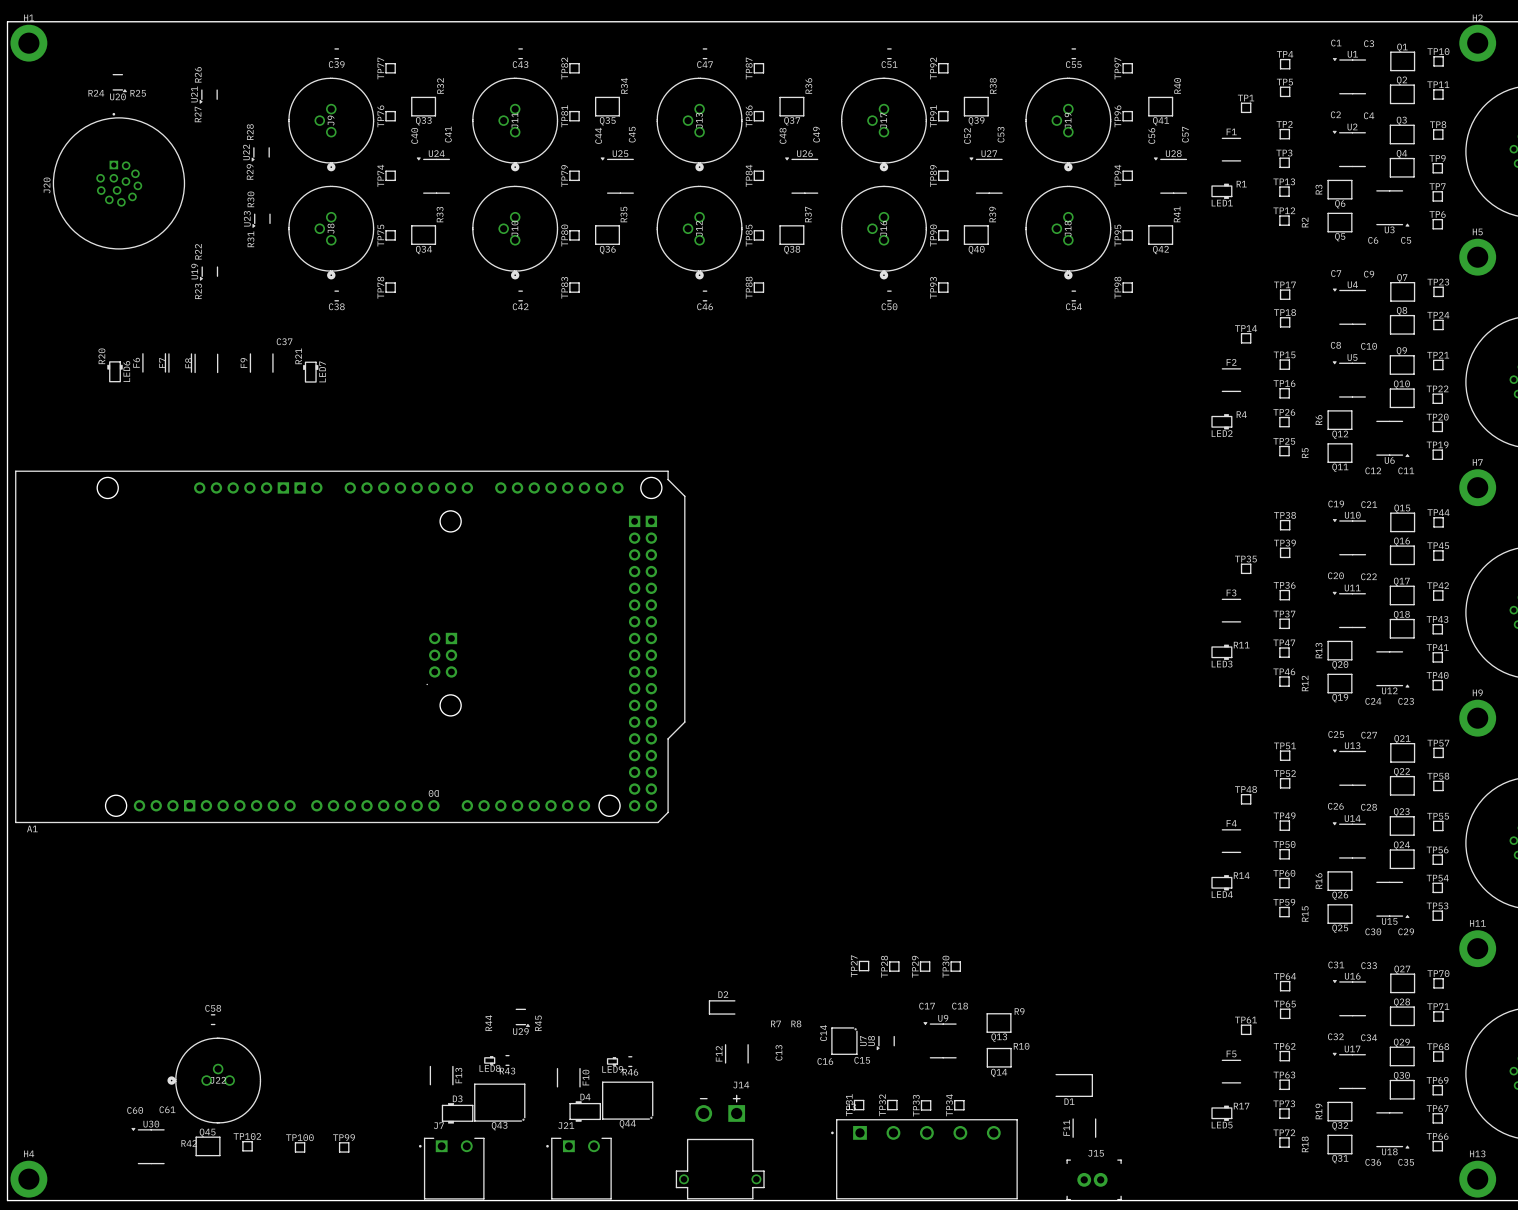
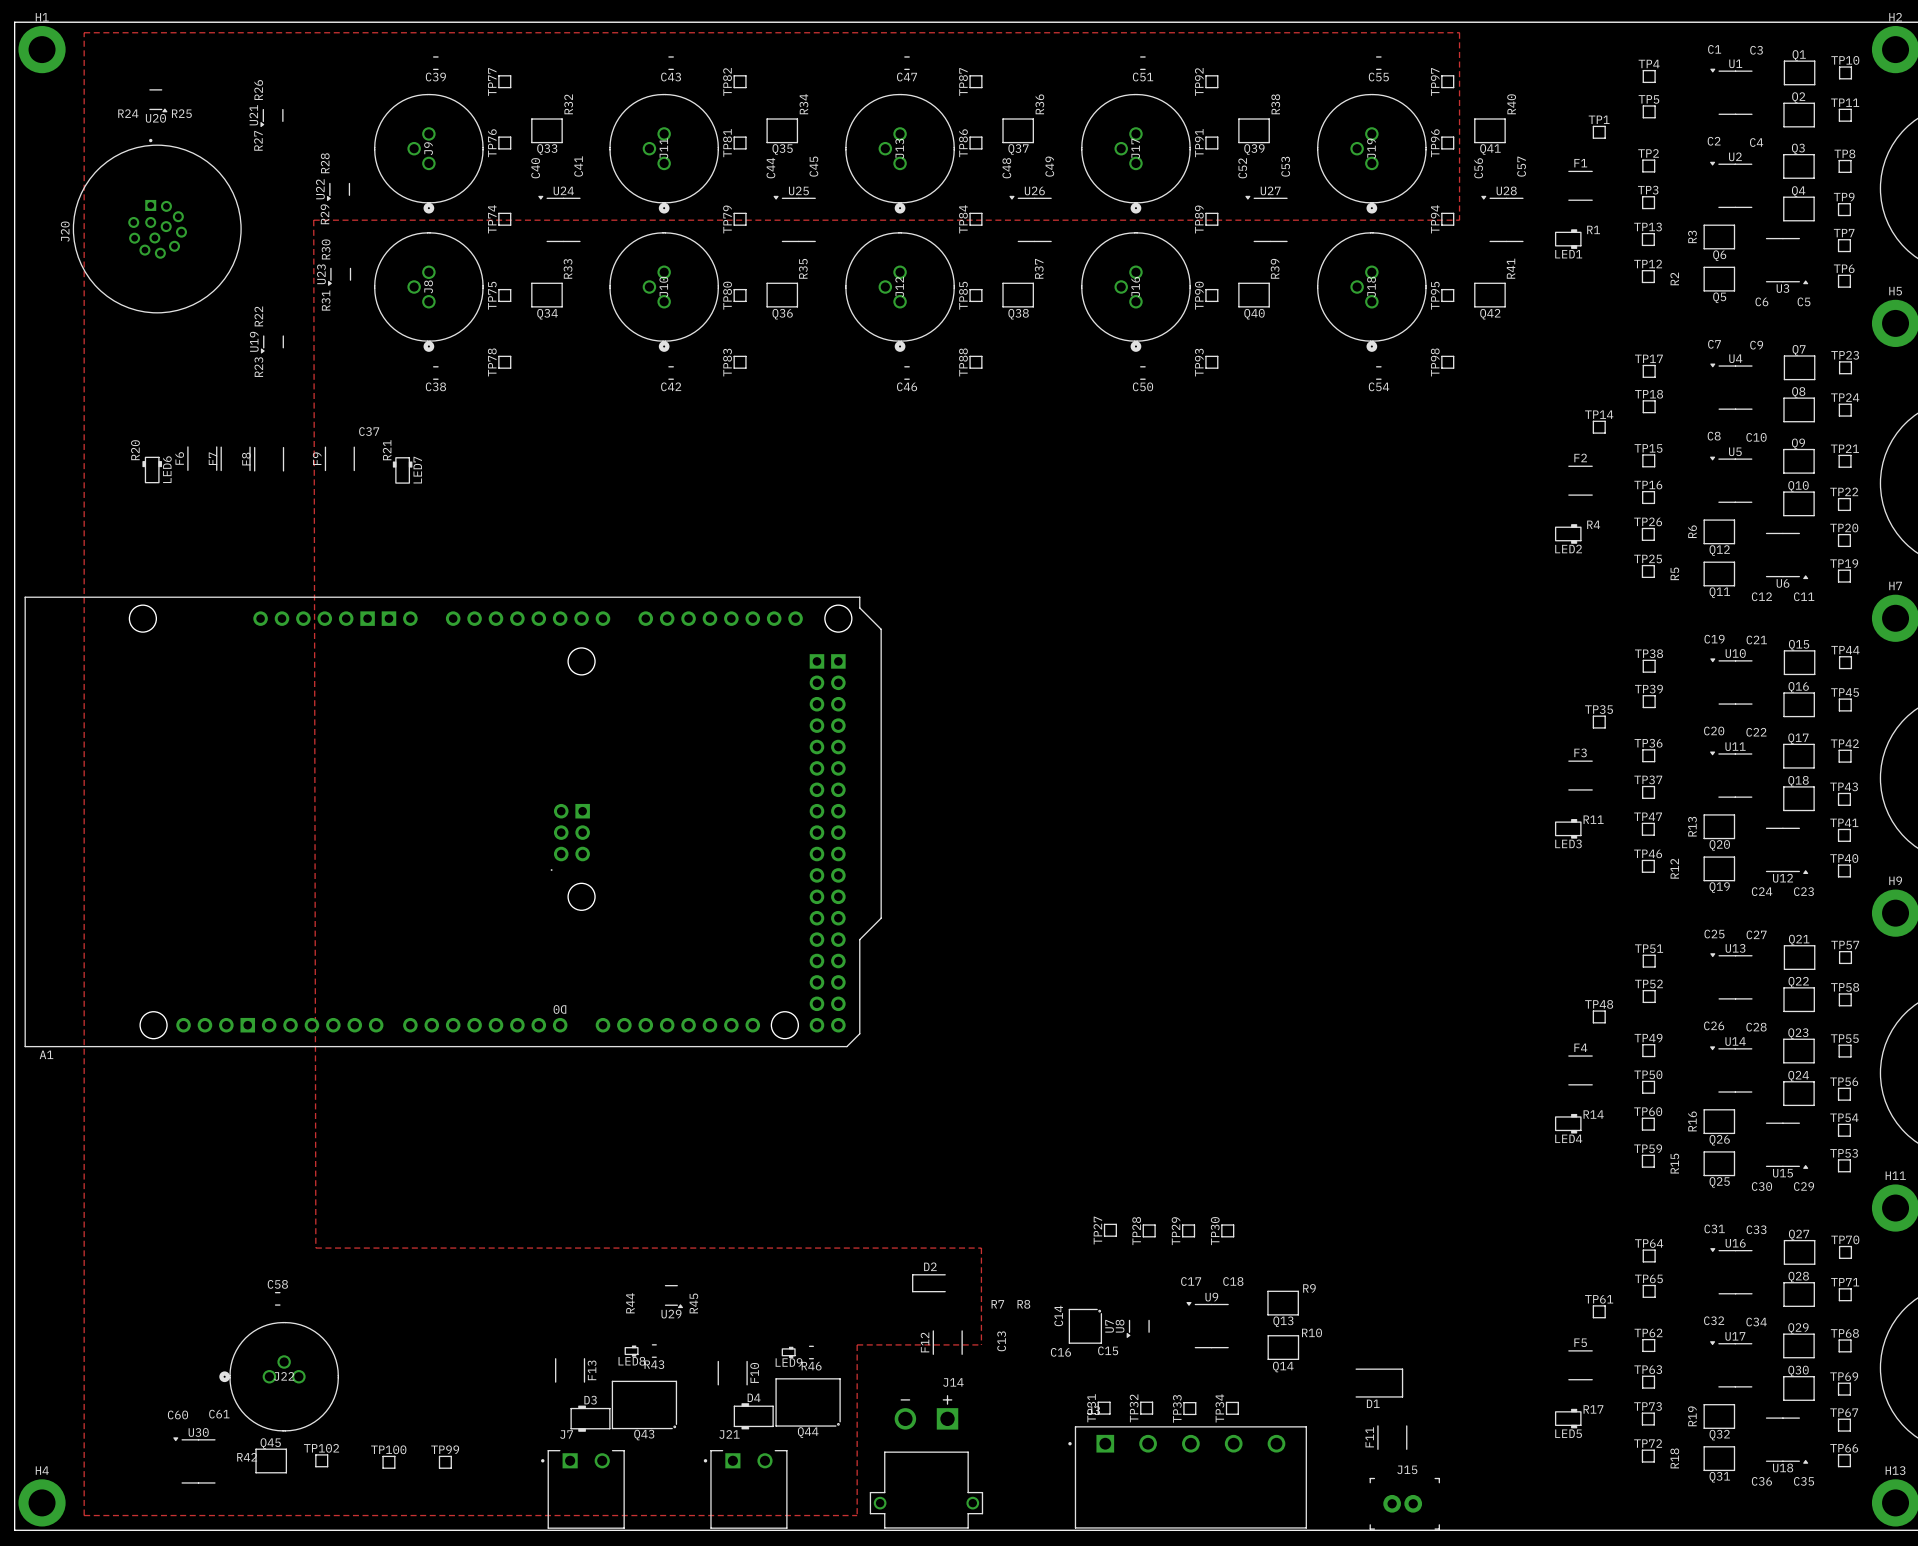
zone outline: none -> (84, 32) (84, 1515) (857, 1515) (857, 1344) (981, 1344) (981, 1248) (315, 1248) (313, 220) (1459, 220) (1459, 32) (84, 32)

